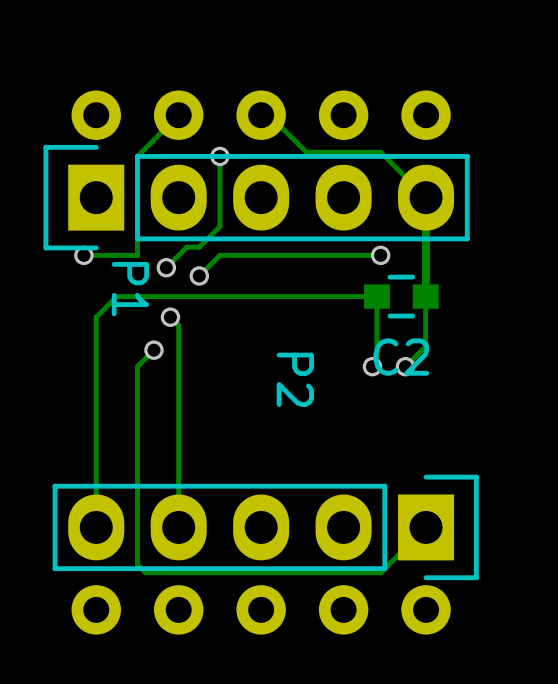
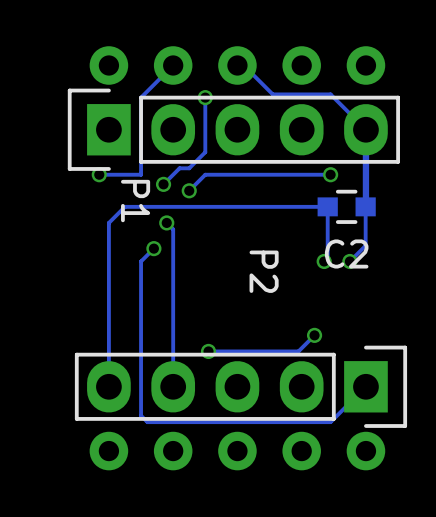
track: none -> (314, 335) (298, 351) (208, 351)
via: none -> (314, 335)
via: none -> (208, 351)

